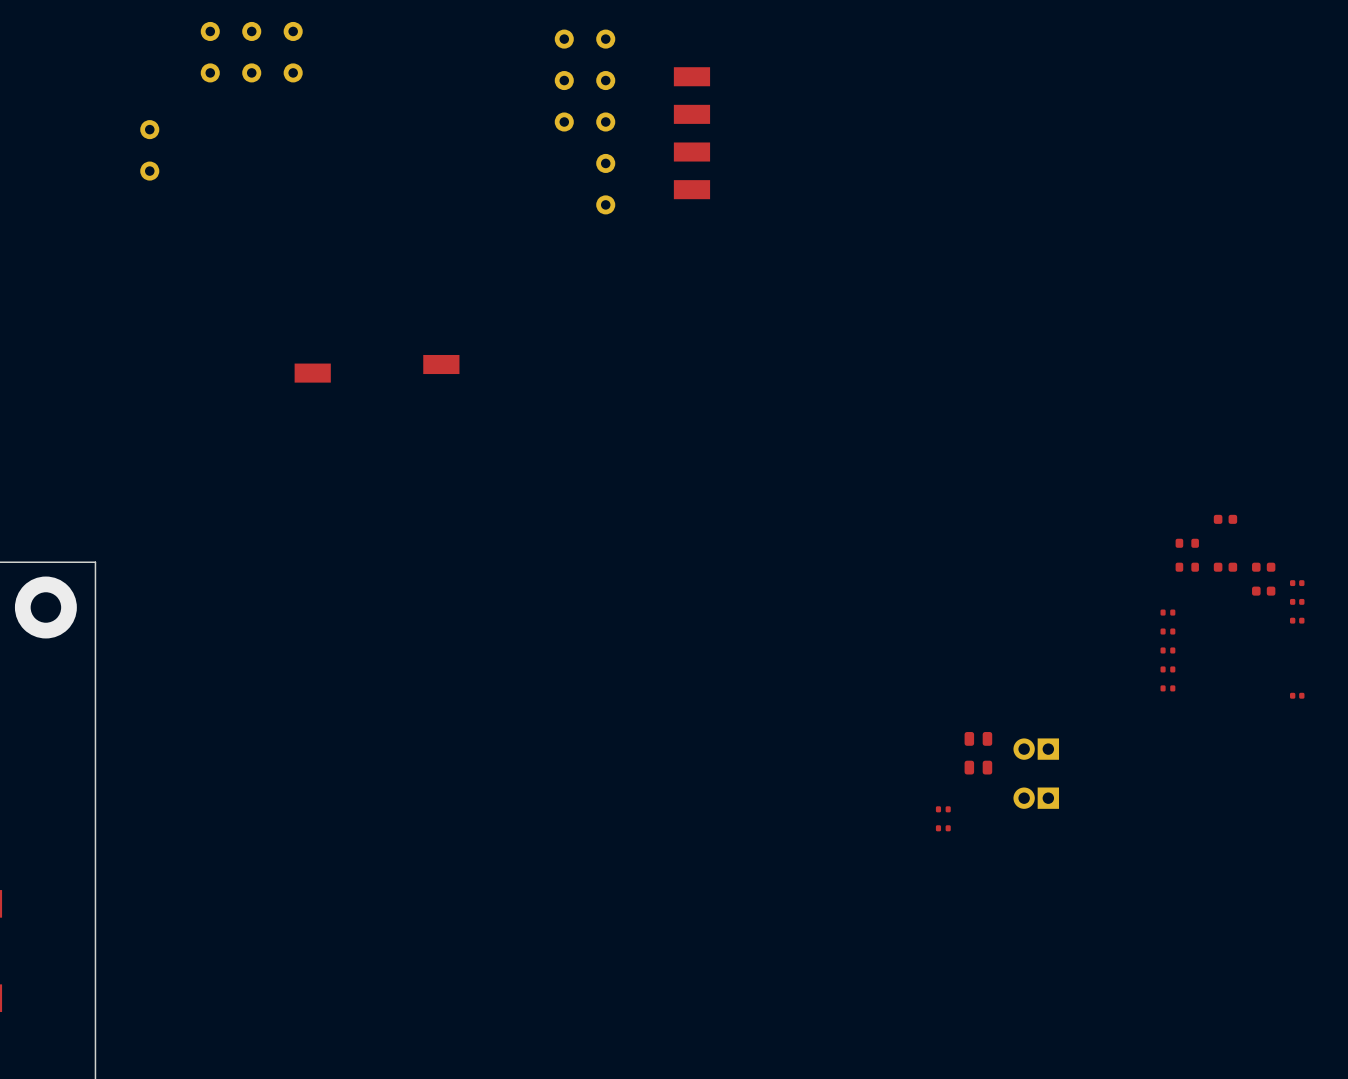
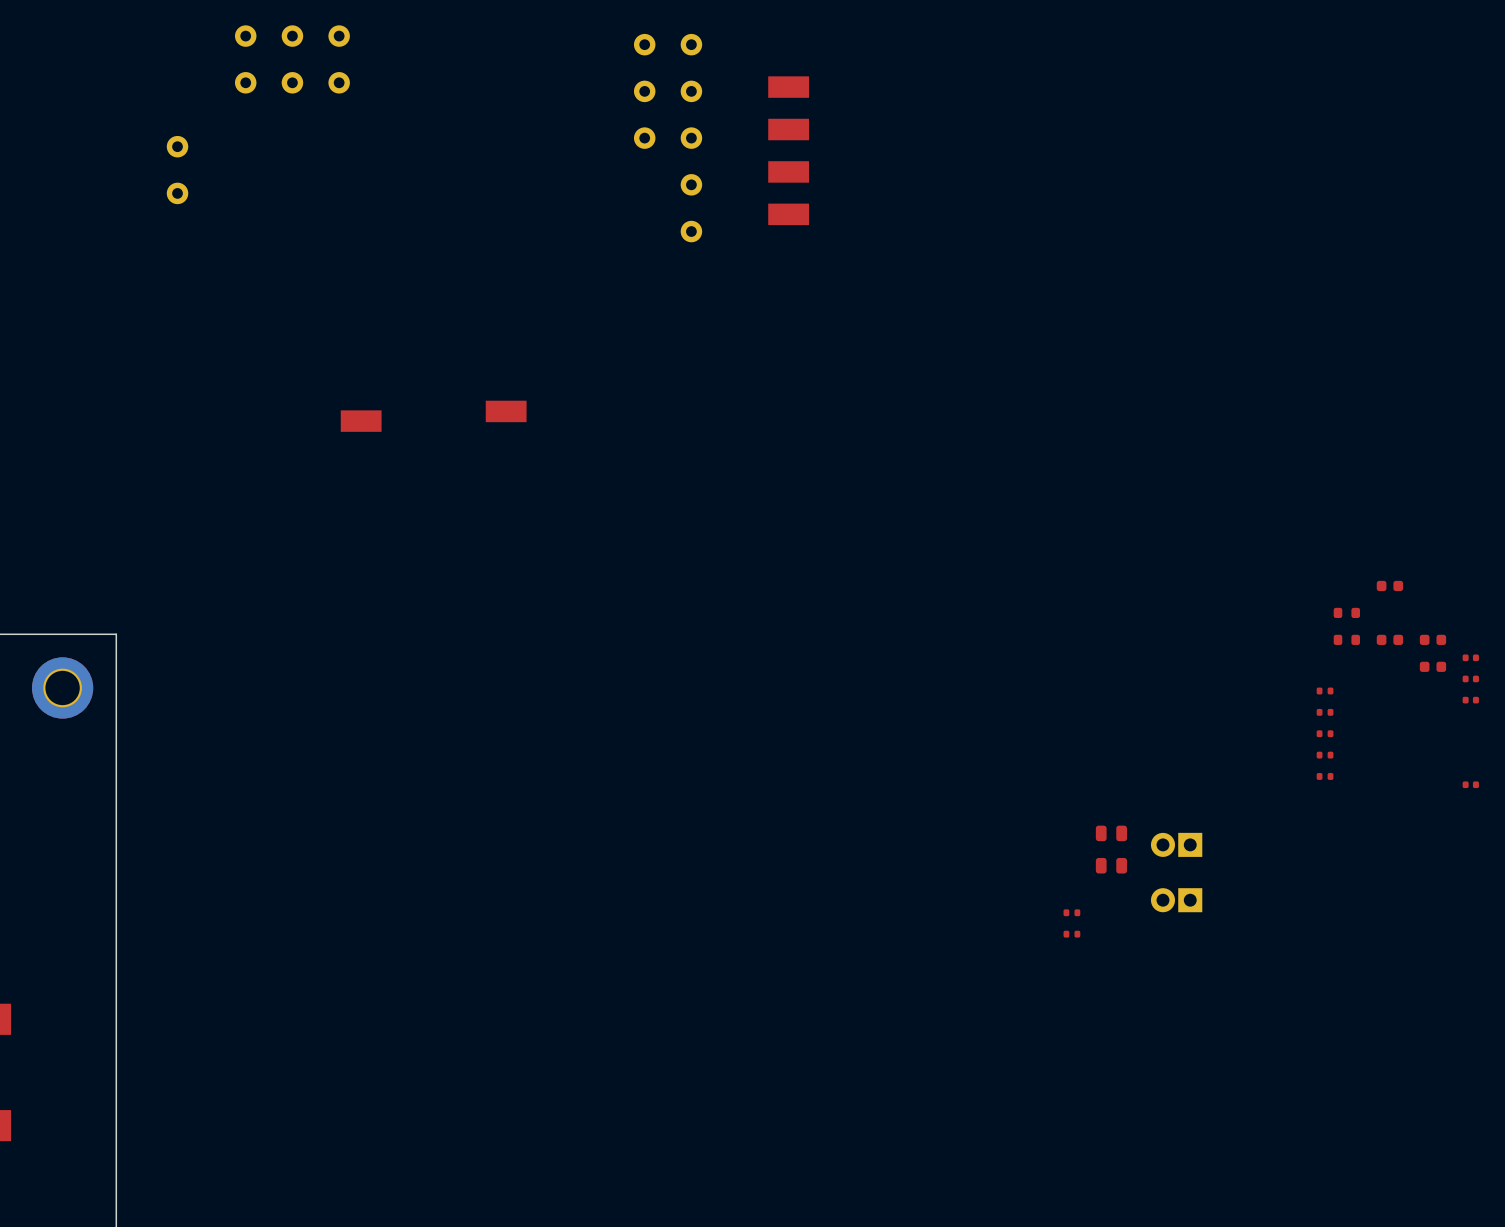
via: (45, 607) -> none
part: none -> (62, 687)

